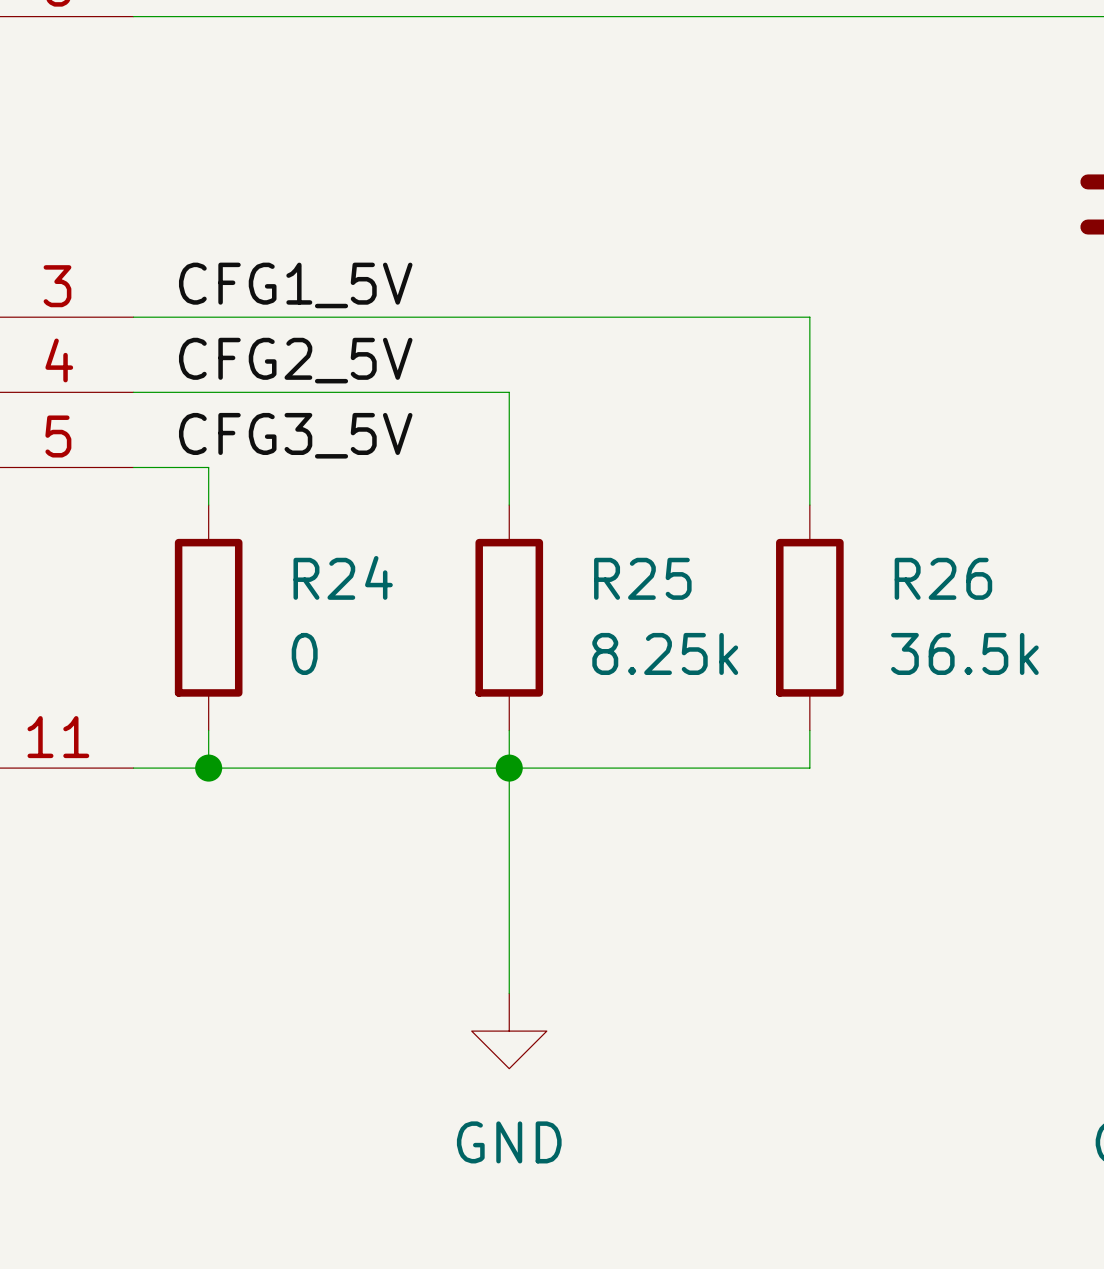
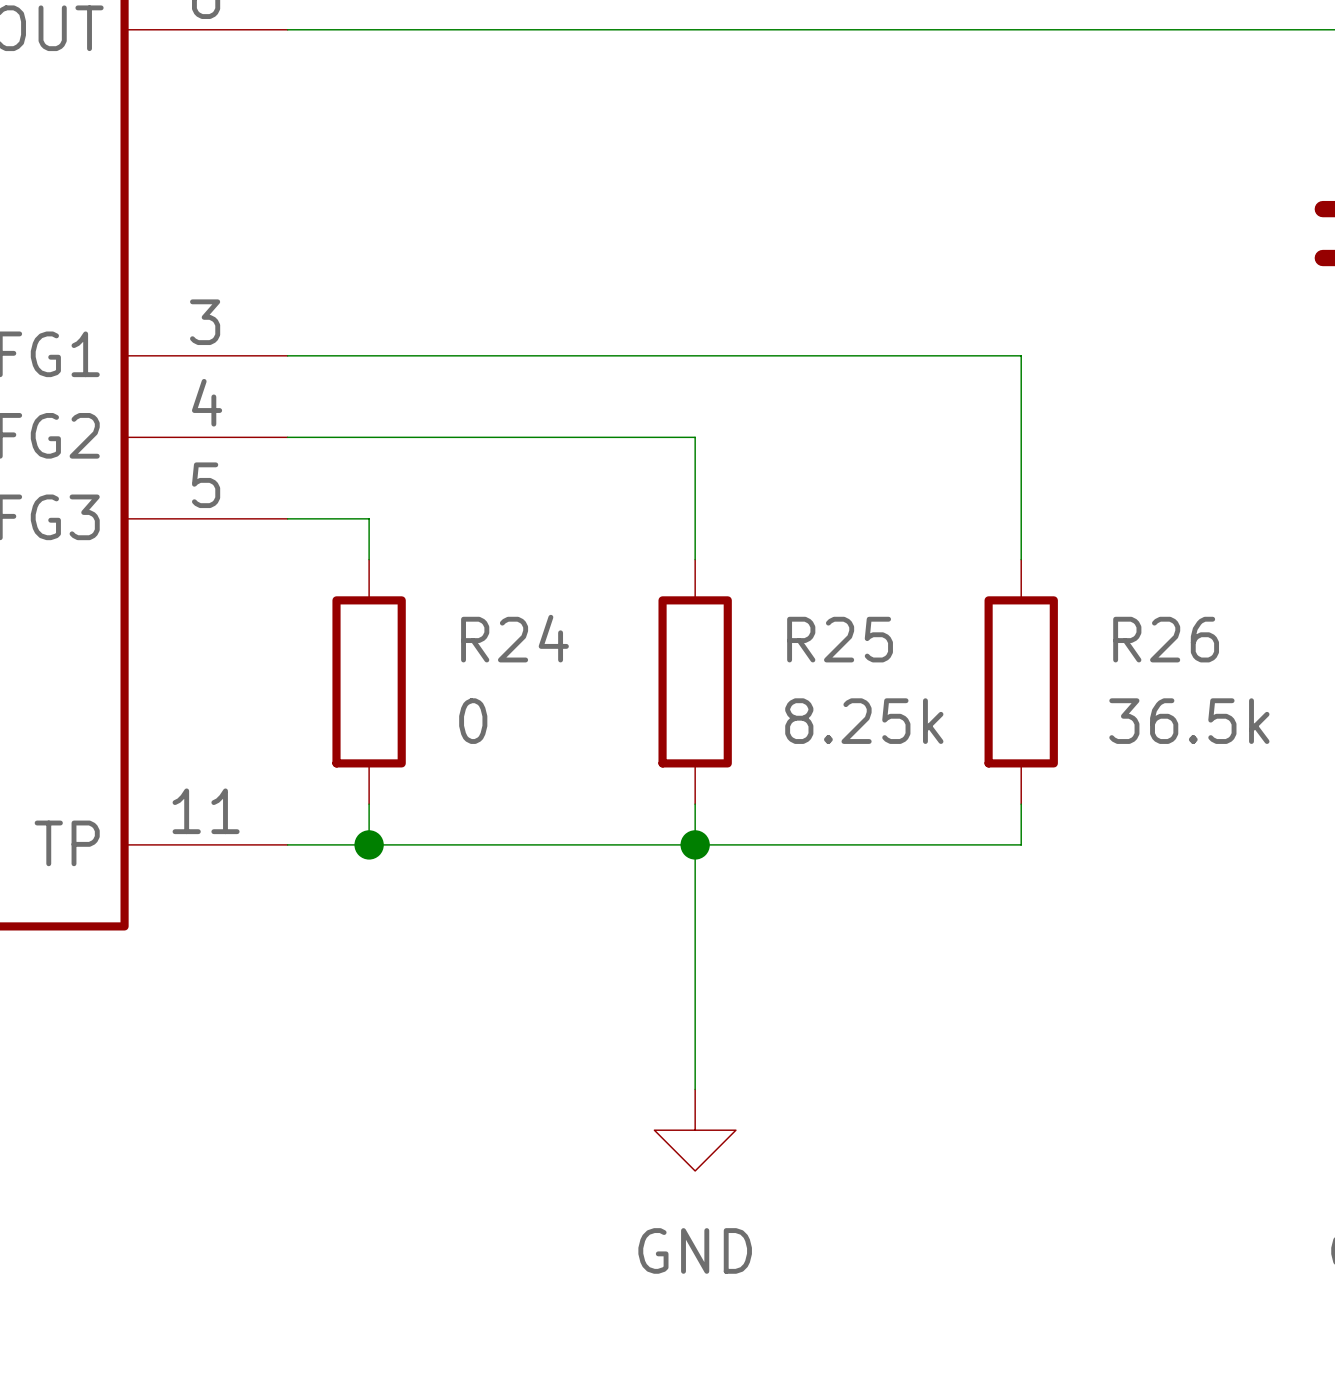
label: CFG1_5V (295, 285) -> none
label: CFG2_5V (295, 360) -> none
label: CFG3_5V (295, 435) -> none

